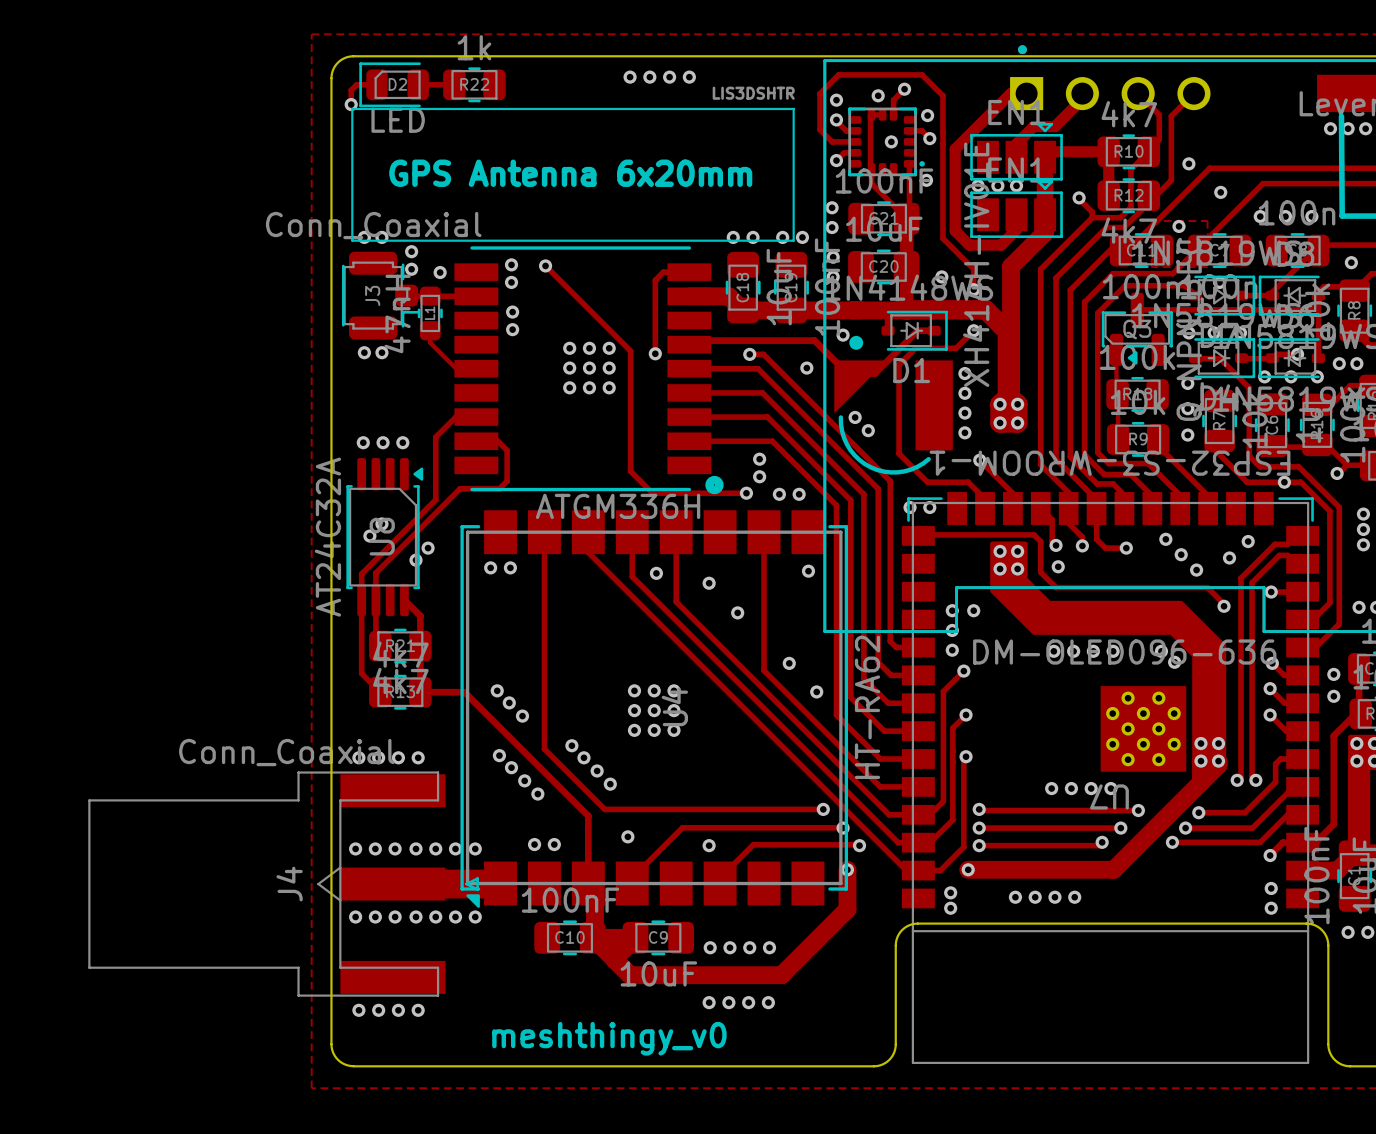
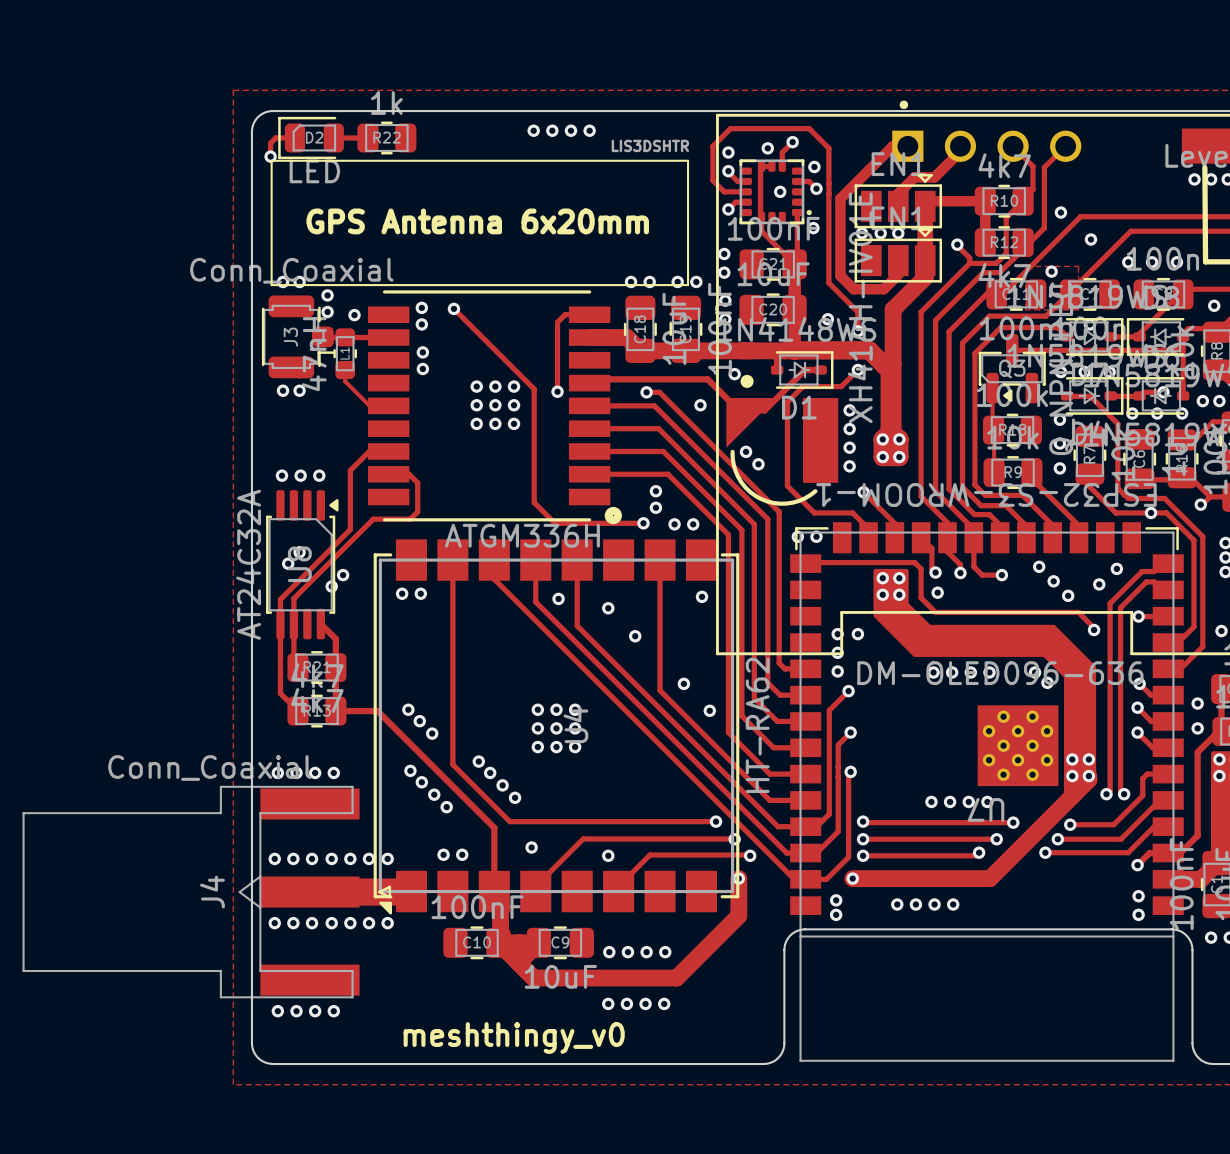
via: (1333, 674) -> none
via: none -> (1197, 703)
via: (1333, 696) -> none
via: none -> (1197, 728)

